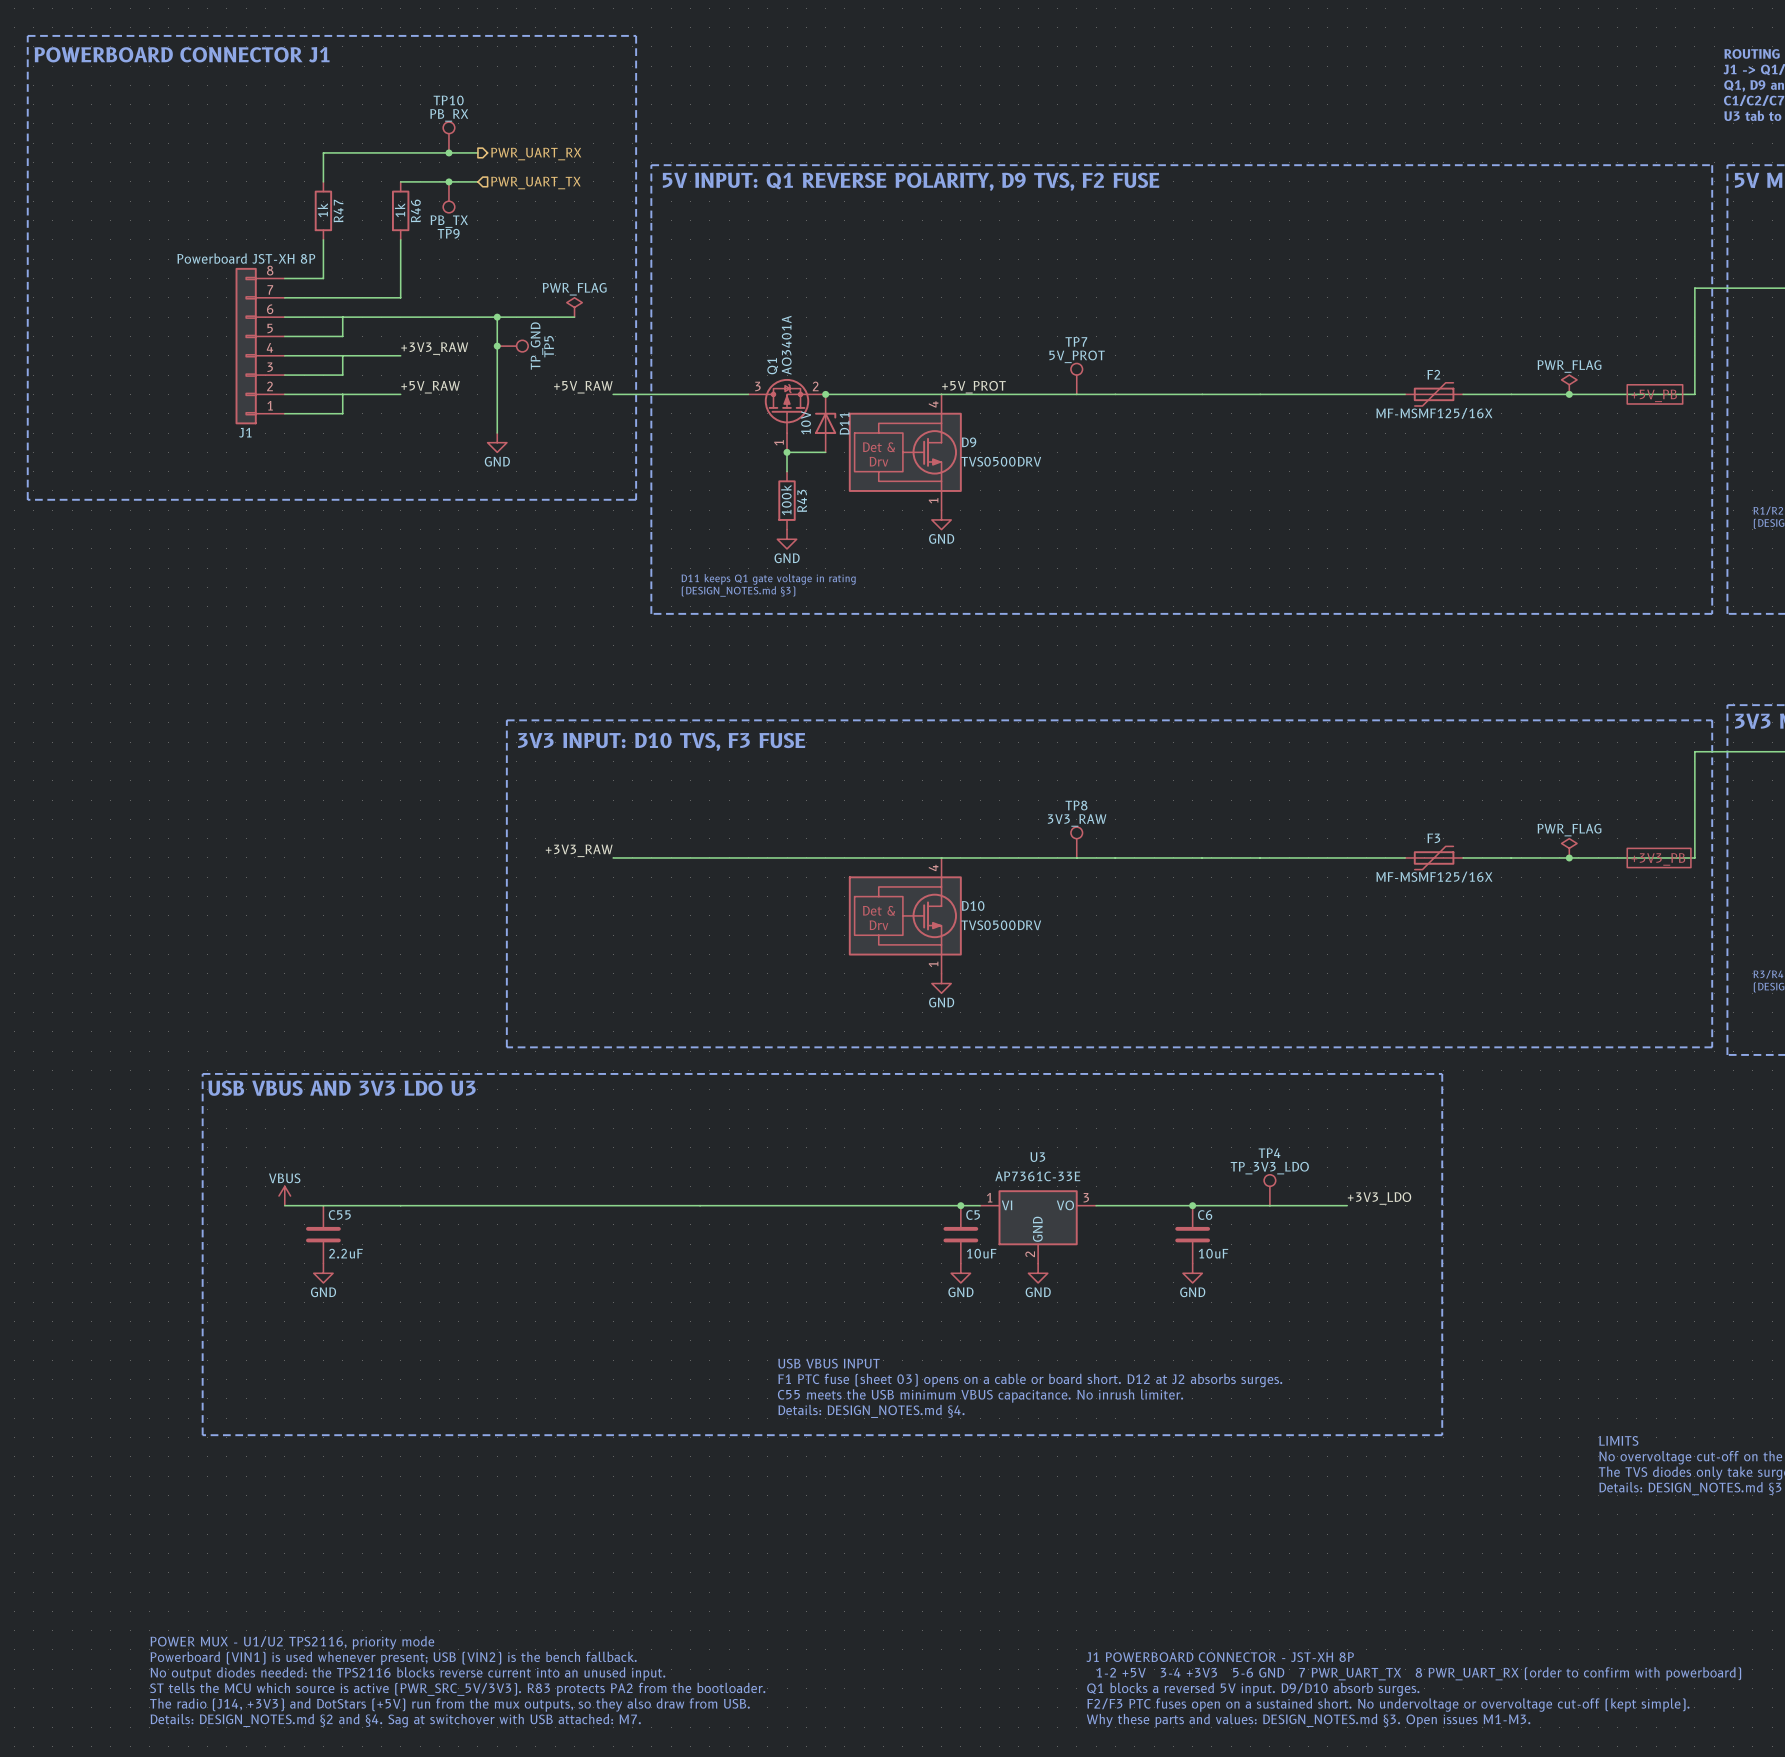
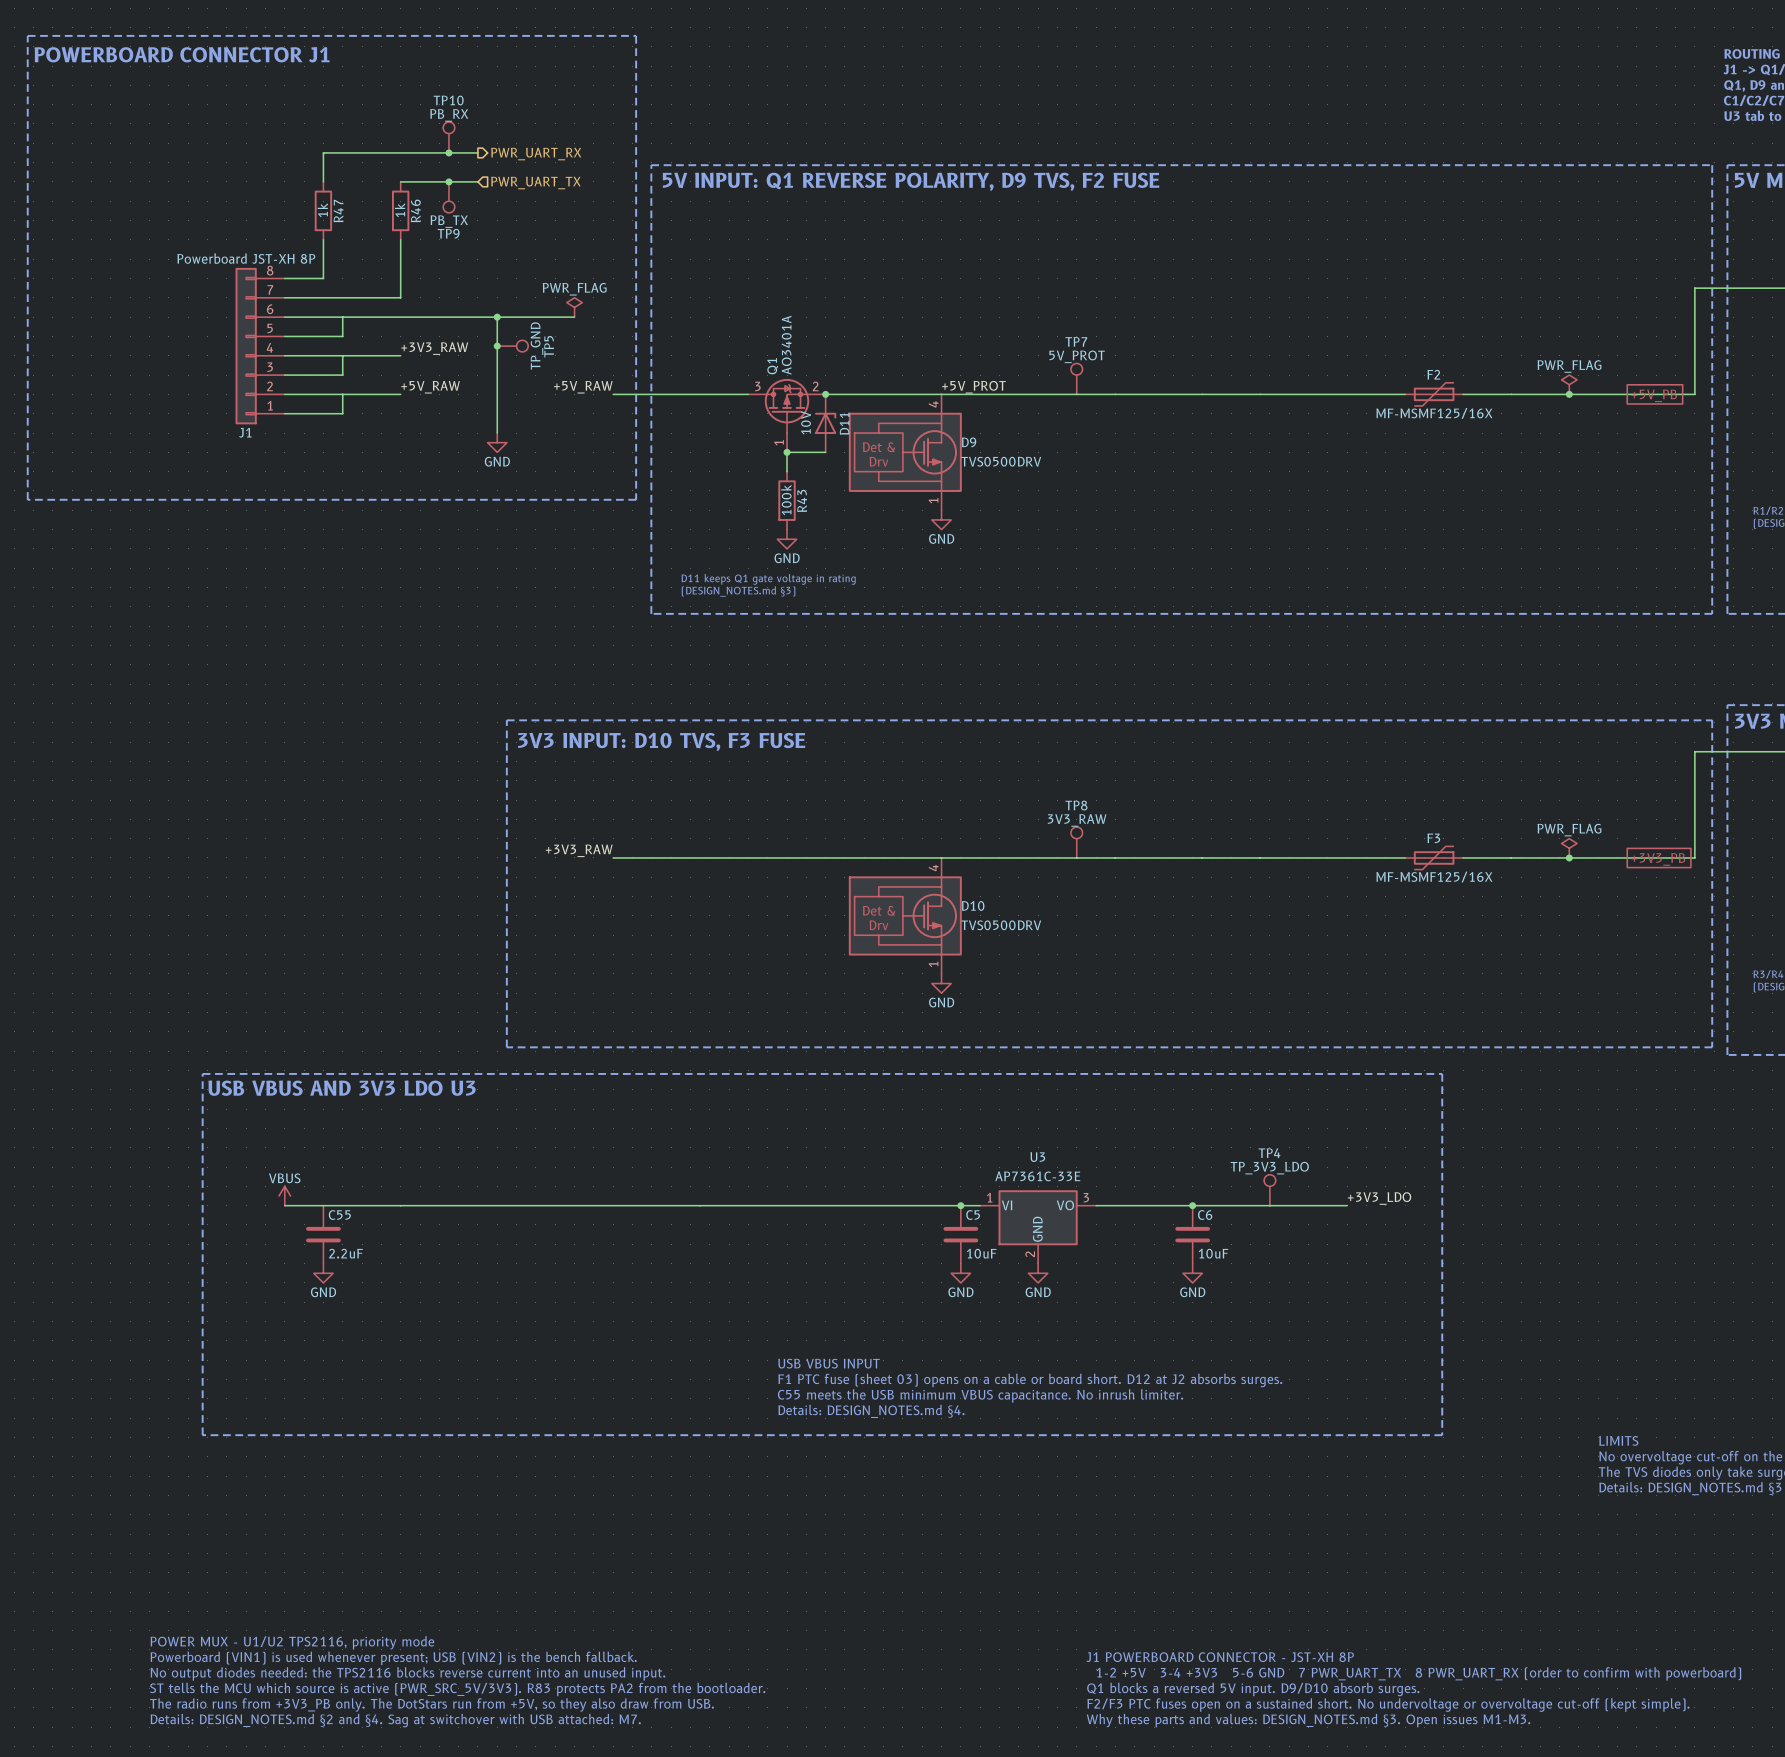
text: The radio (J14, +3V3) and DotStars (+5V) run from the mux outputs, so they also draw from USB. (449, 1705) -> The radio runs from +3V3_PB only. The DotStars run from +5V, so they also draw from USB. (431, 1704)

